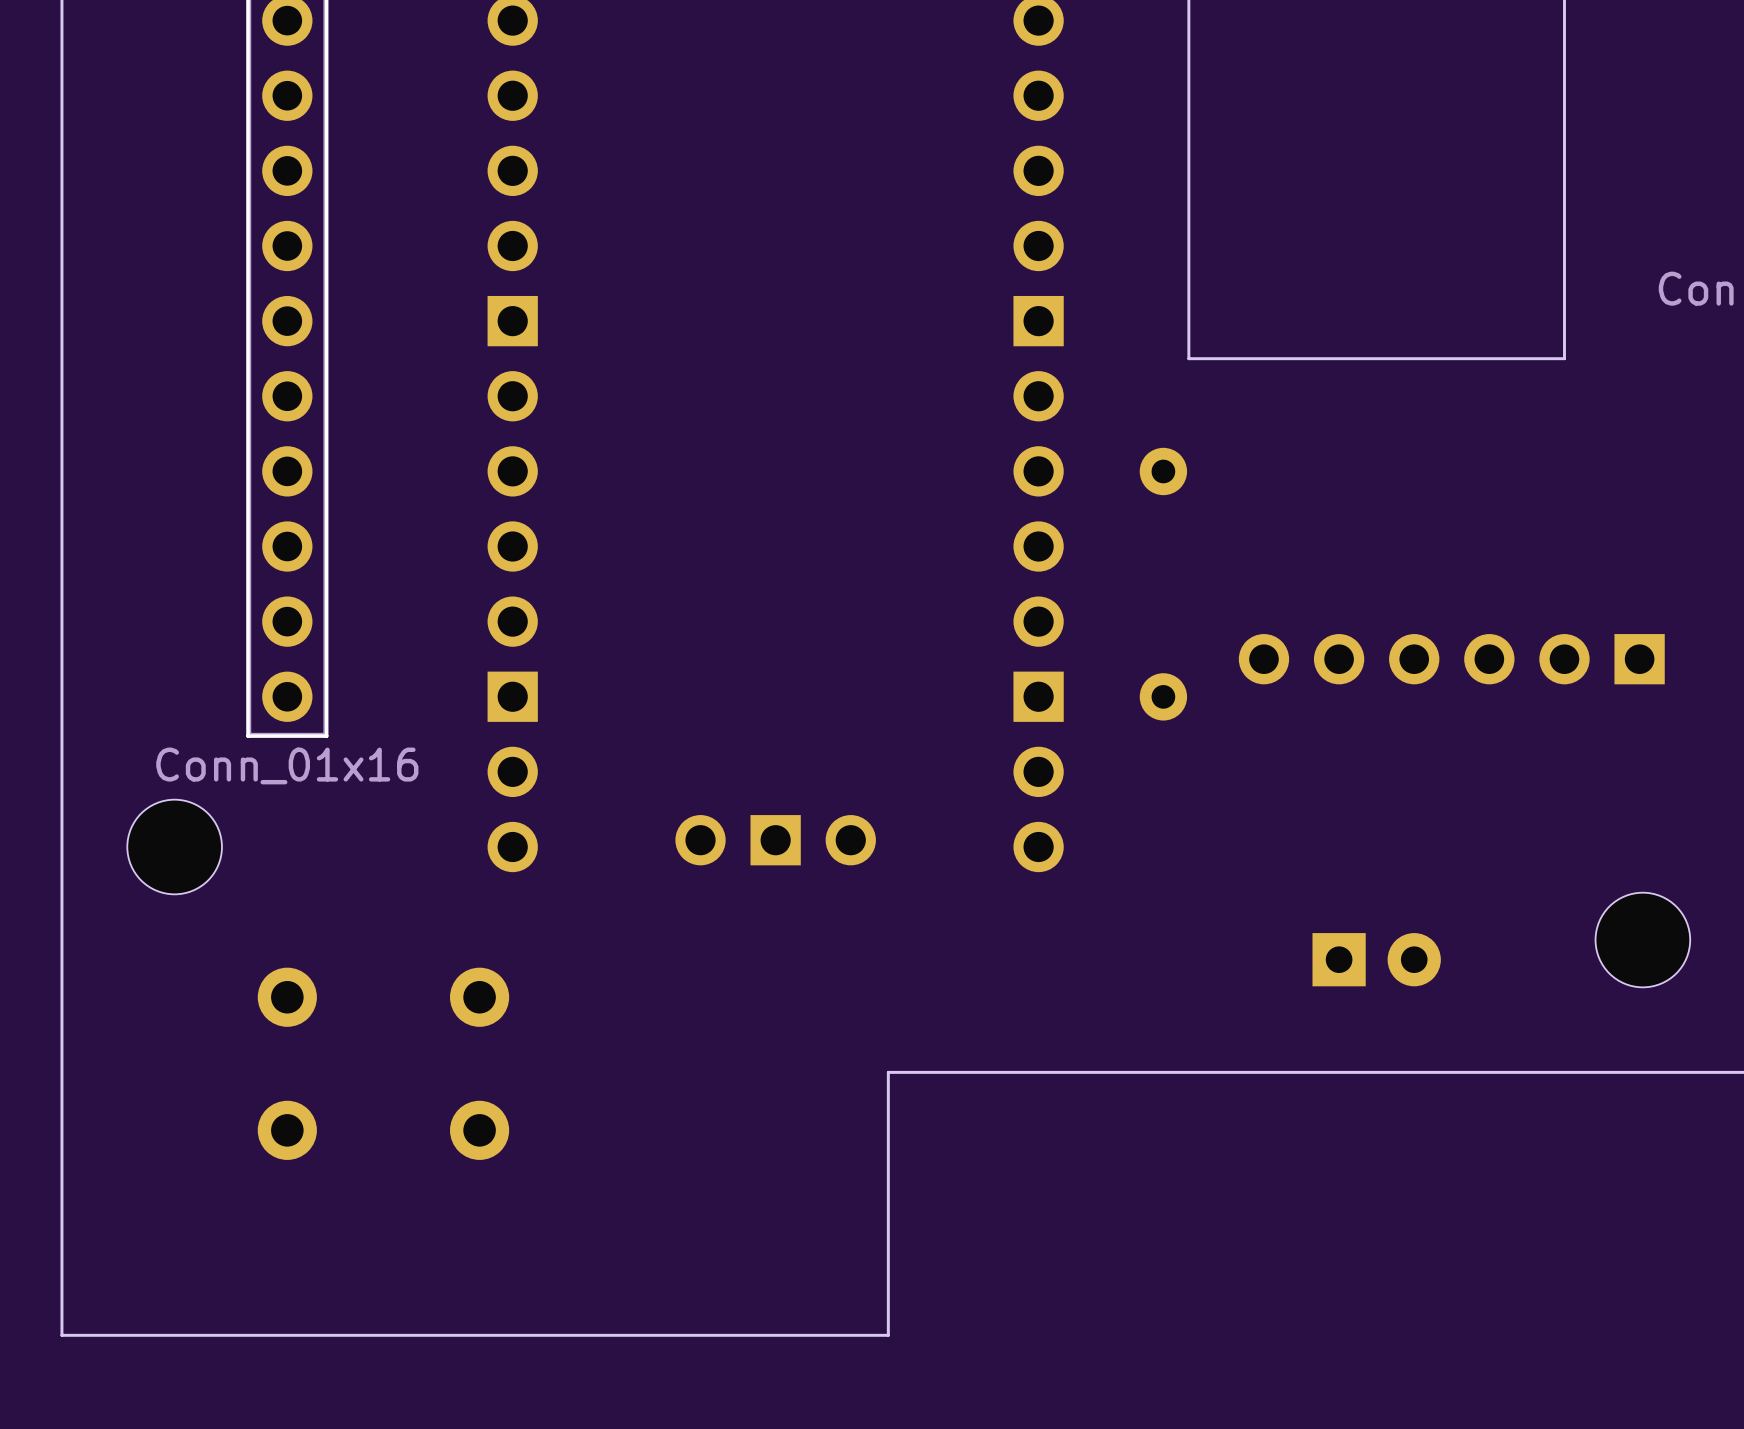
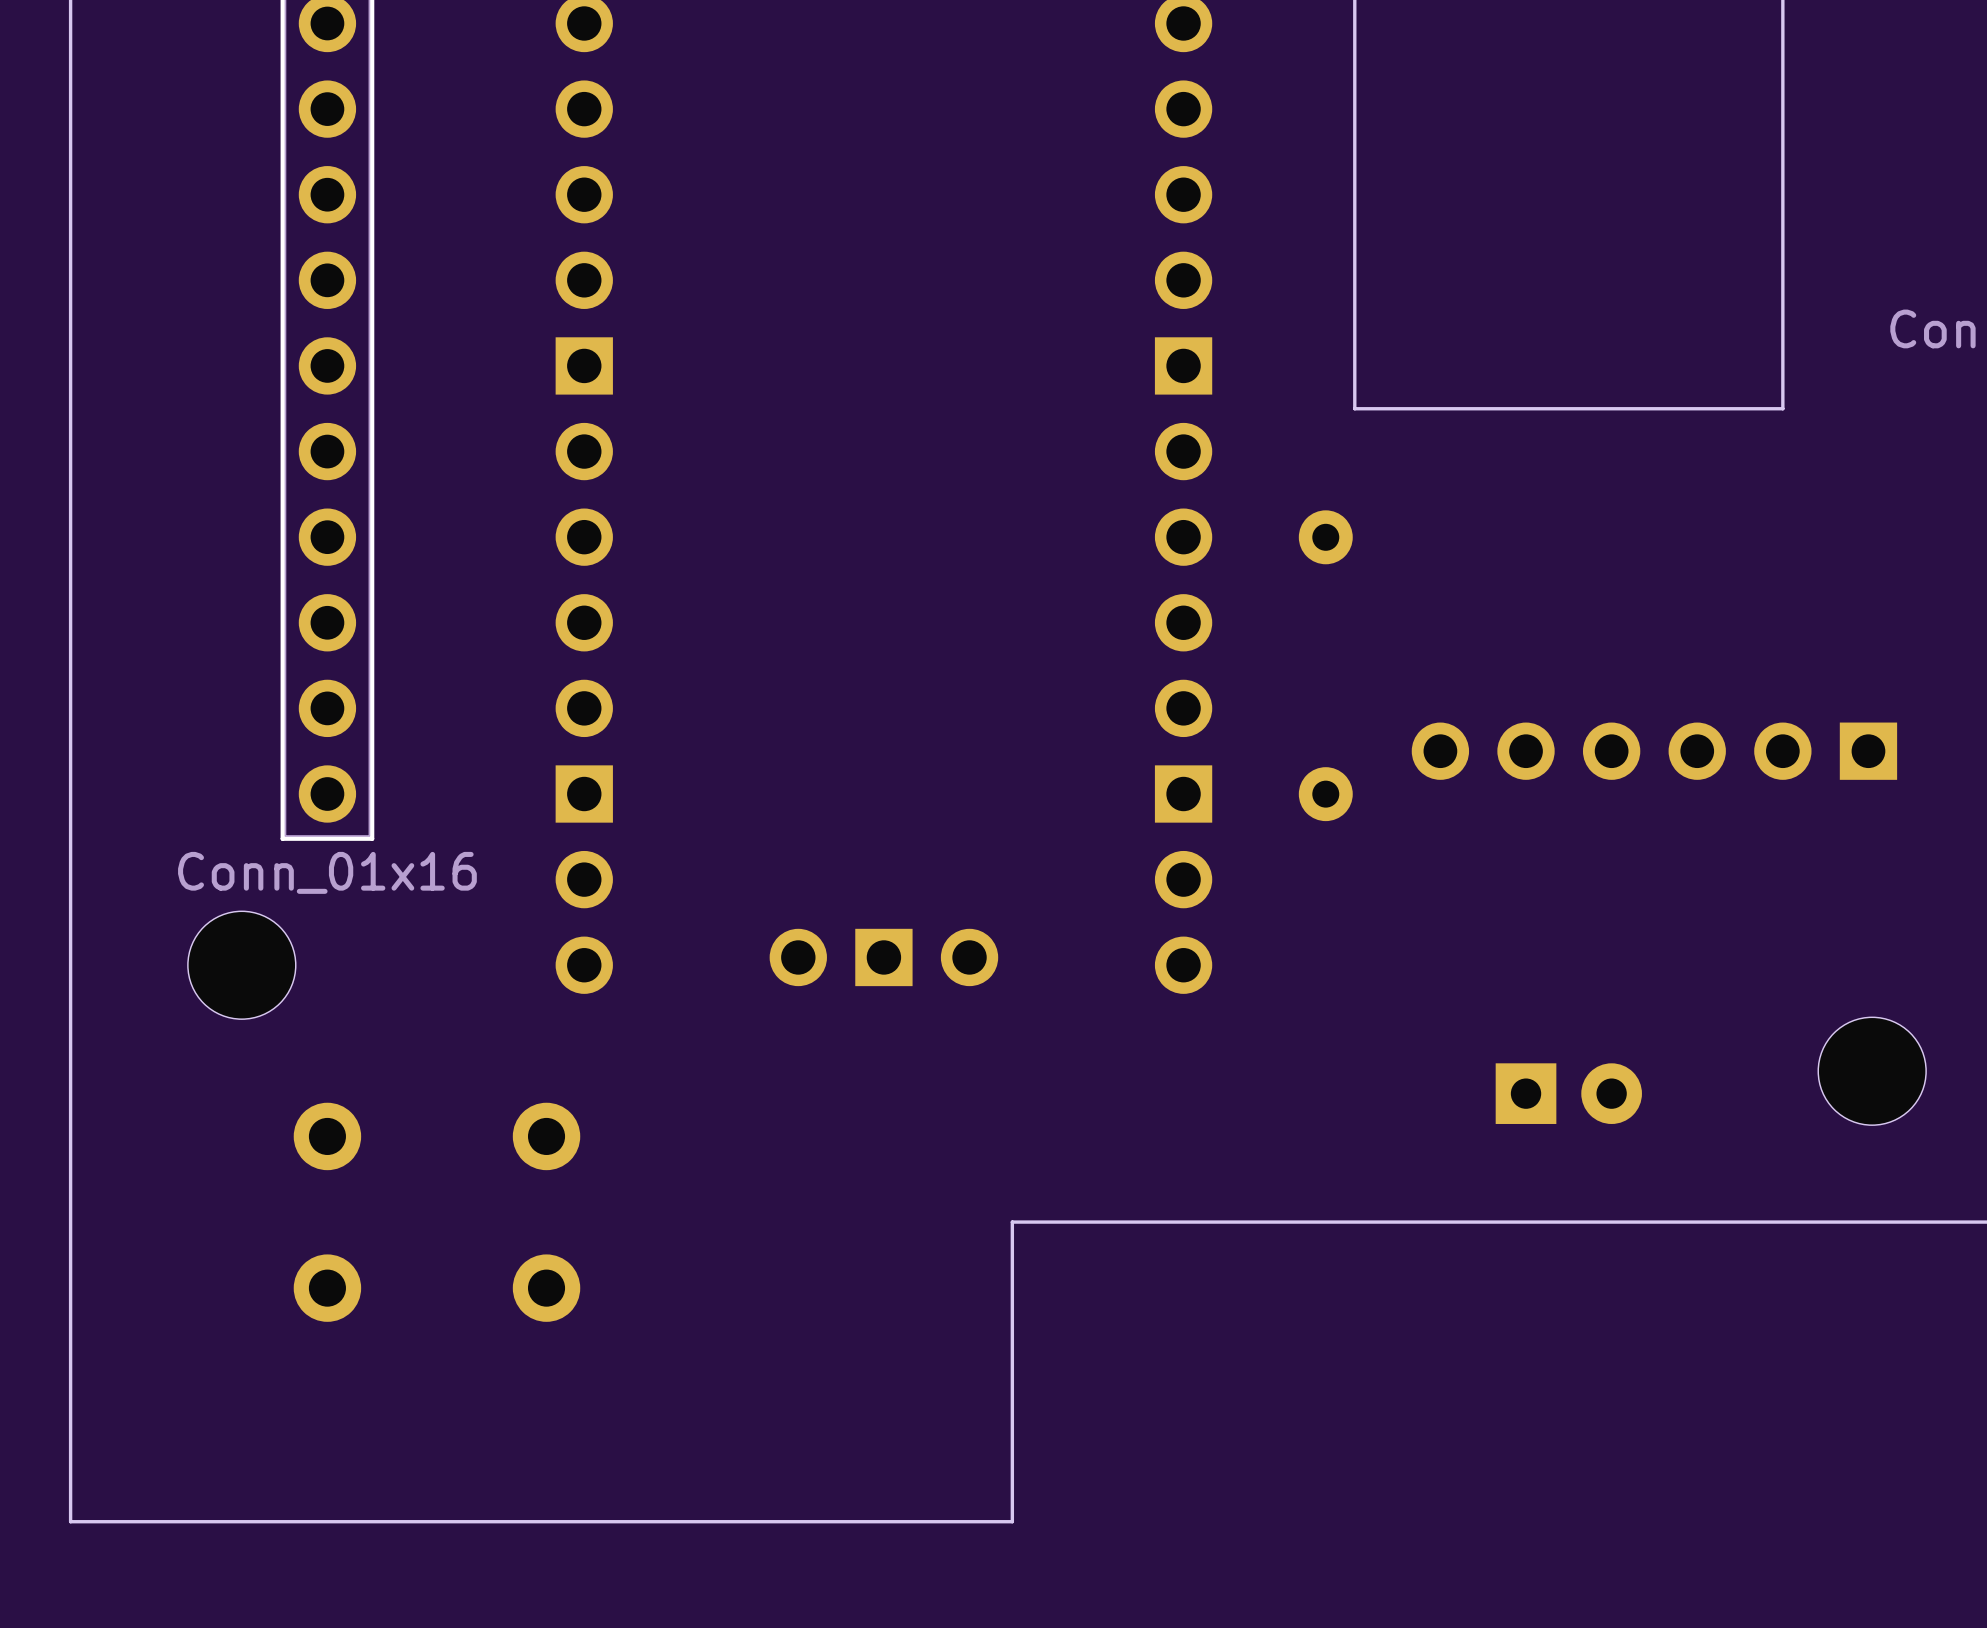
part position: (174, 847) -> (241, 965)

